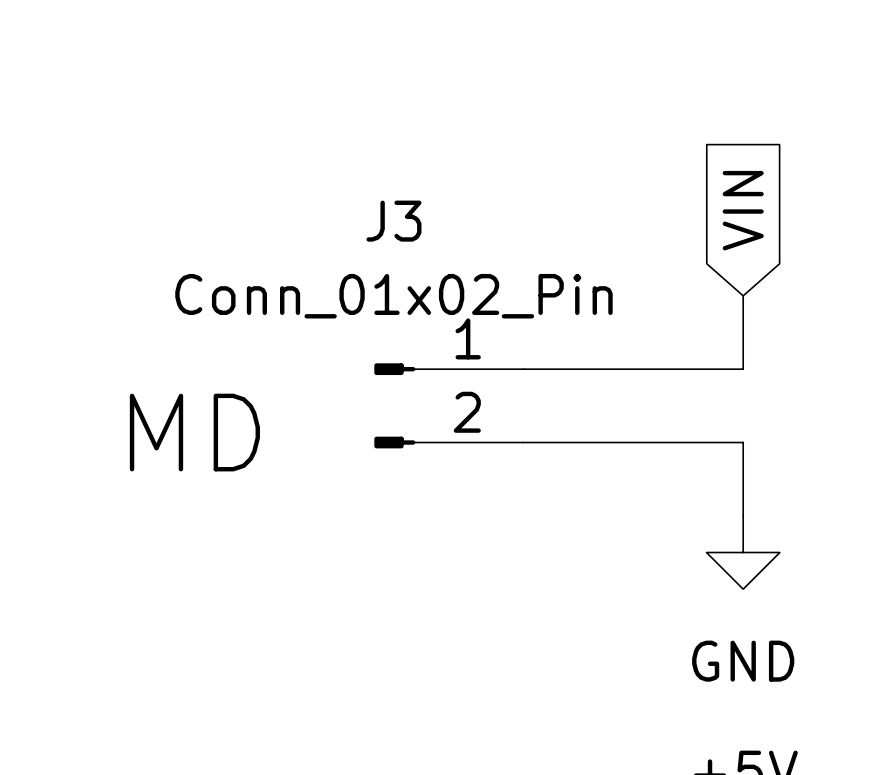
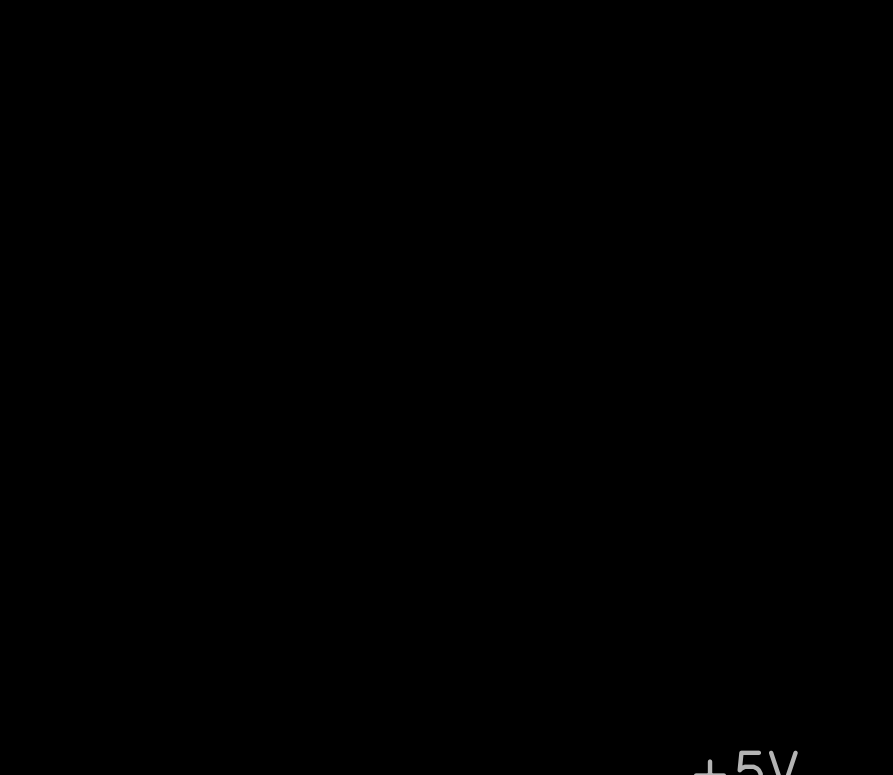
global label: VIN (743, 210) -> none
wire: (743, 295) (743, 369) (523, 369) -> none
J3: Conn_01x02_Pin (448, 405) -> none
text: MD (194, 432) -> none
wire: (523, 442) (743, 442) (743, 515) -> none
power symbol: GND (743, 552) -> none

